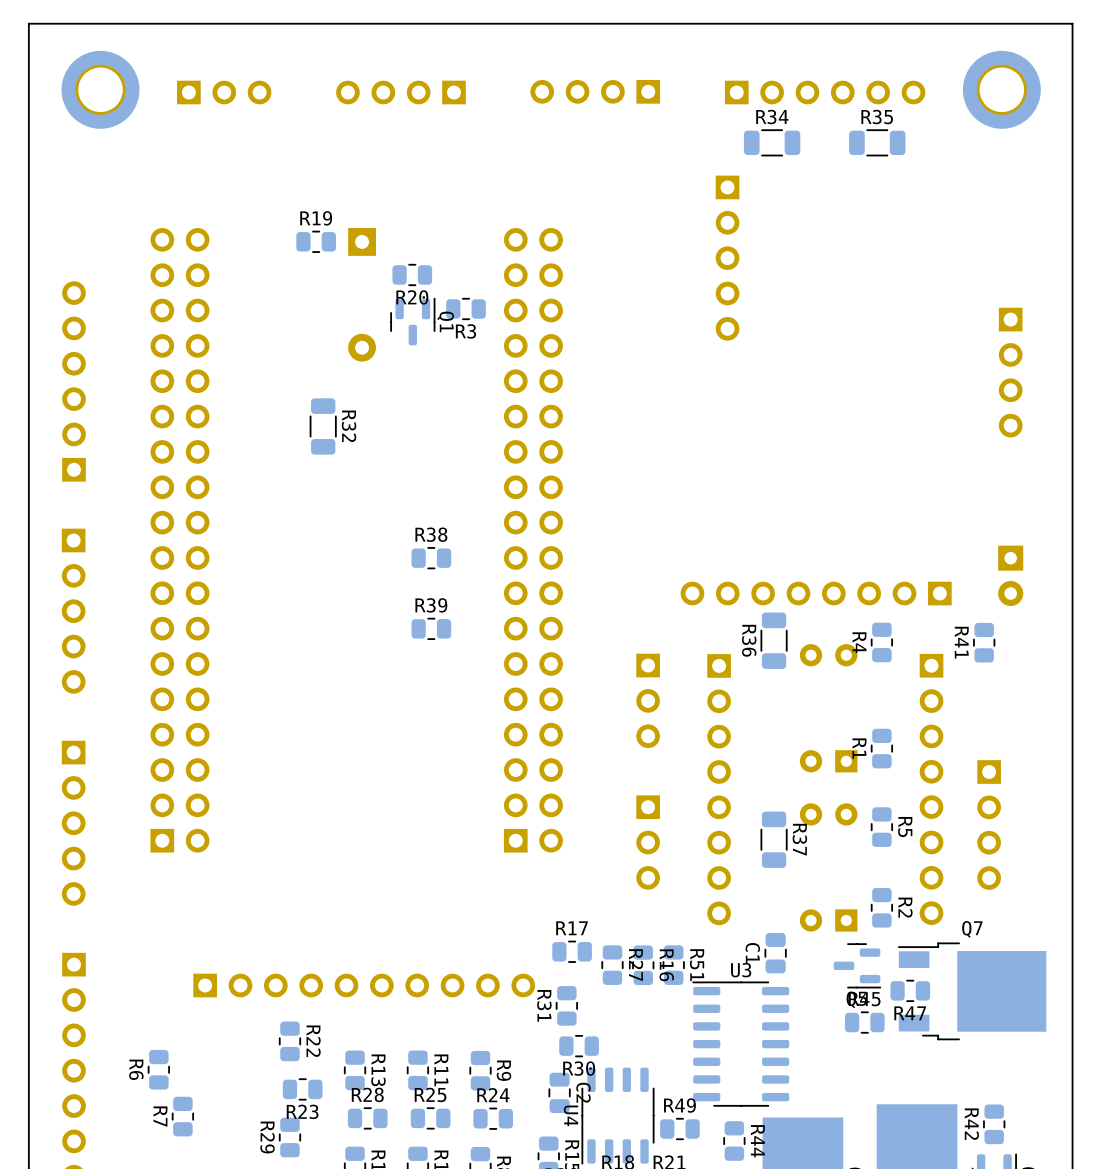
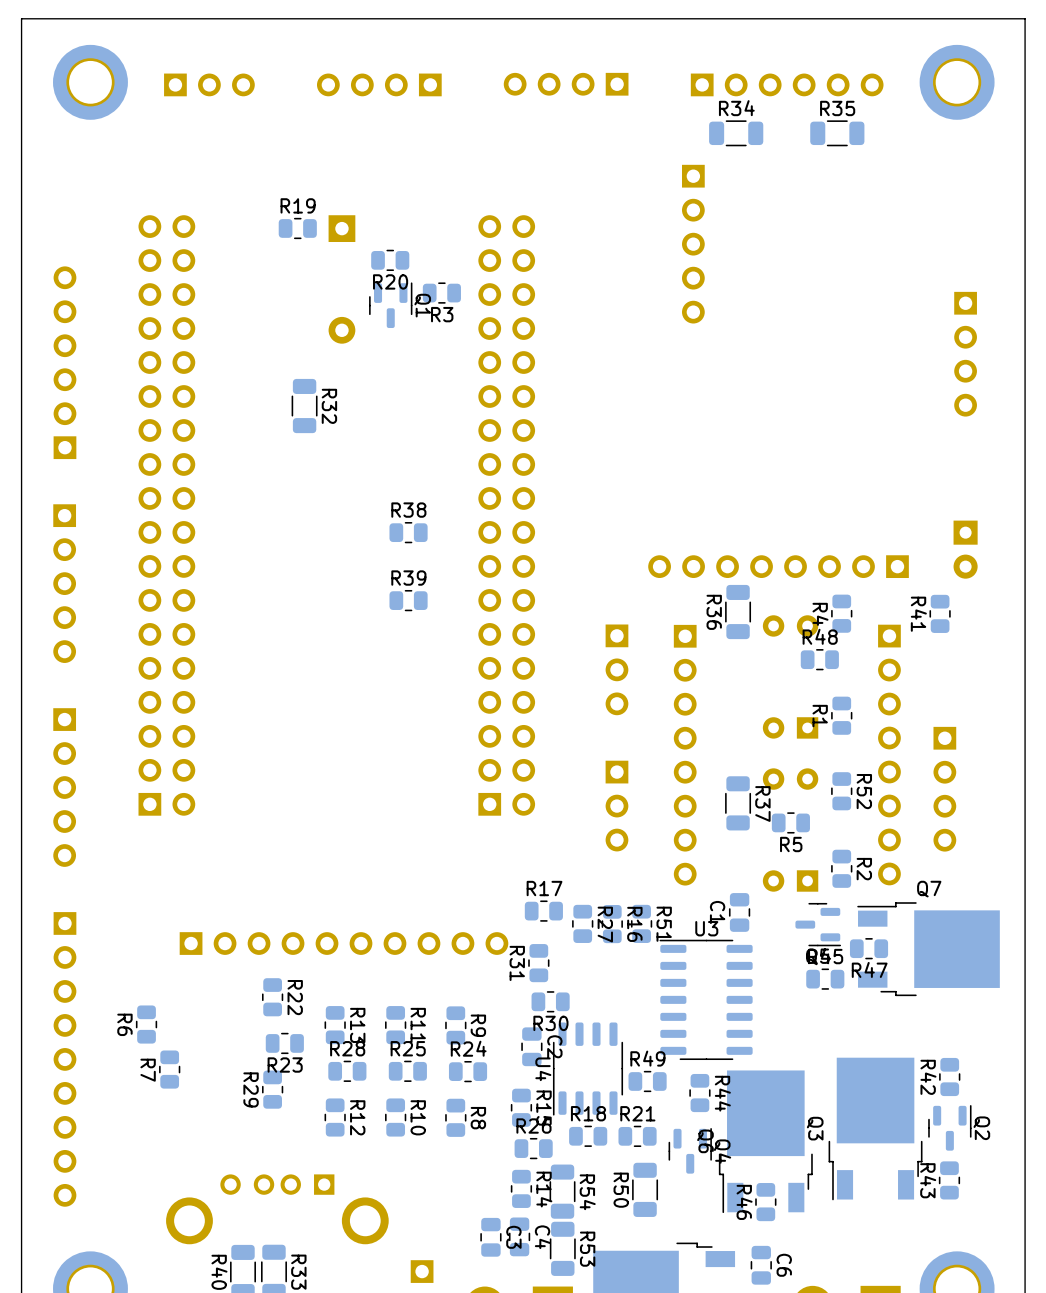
R48: none -> (819, 659)
R5 name: R5 (905, 827) -> R52 (864, 791)
R5: none -> (790, 822)

